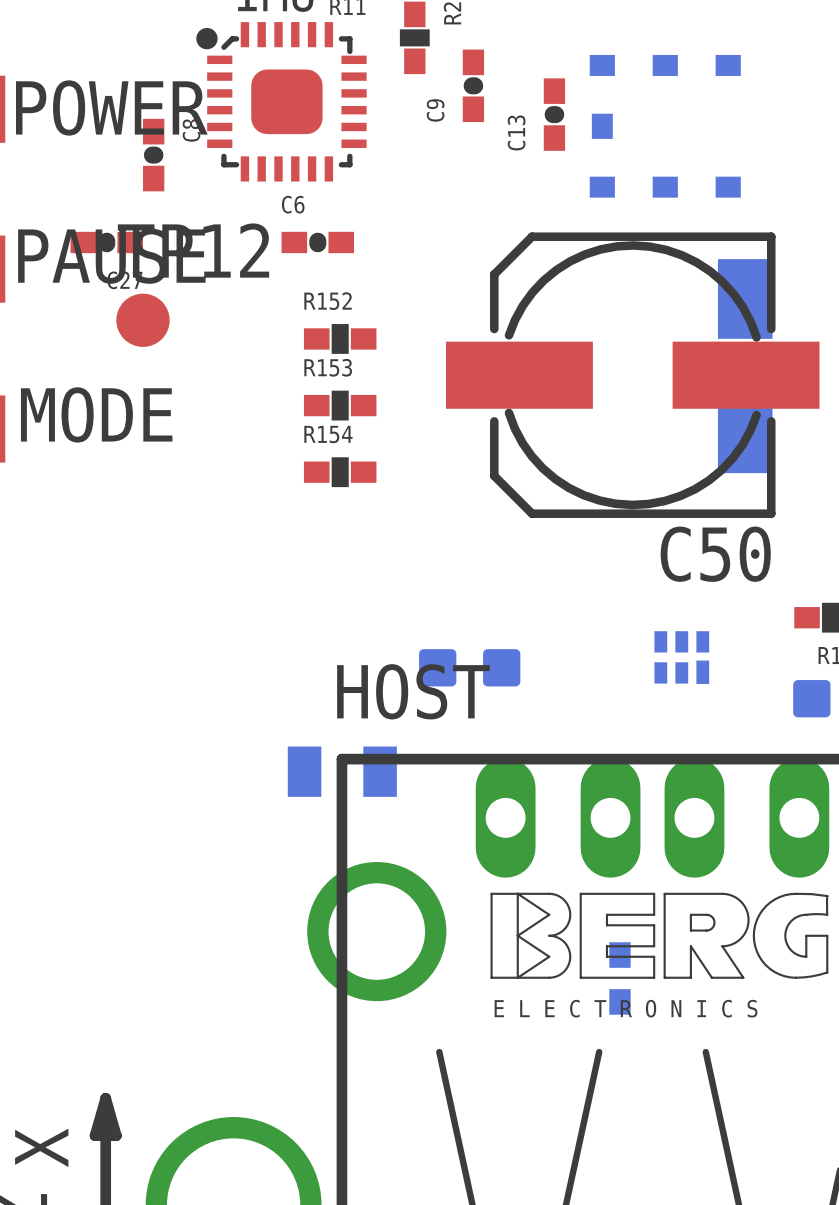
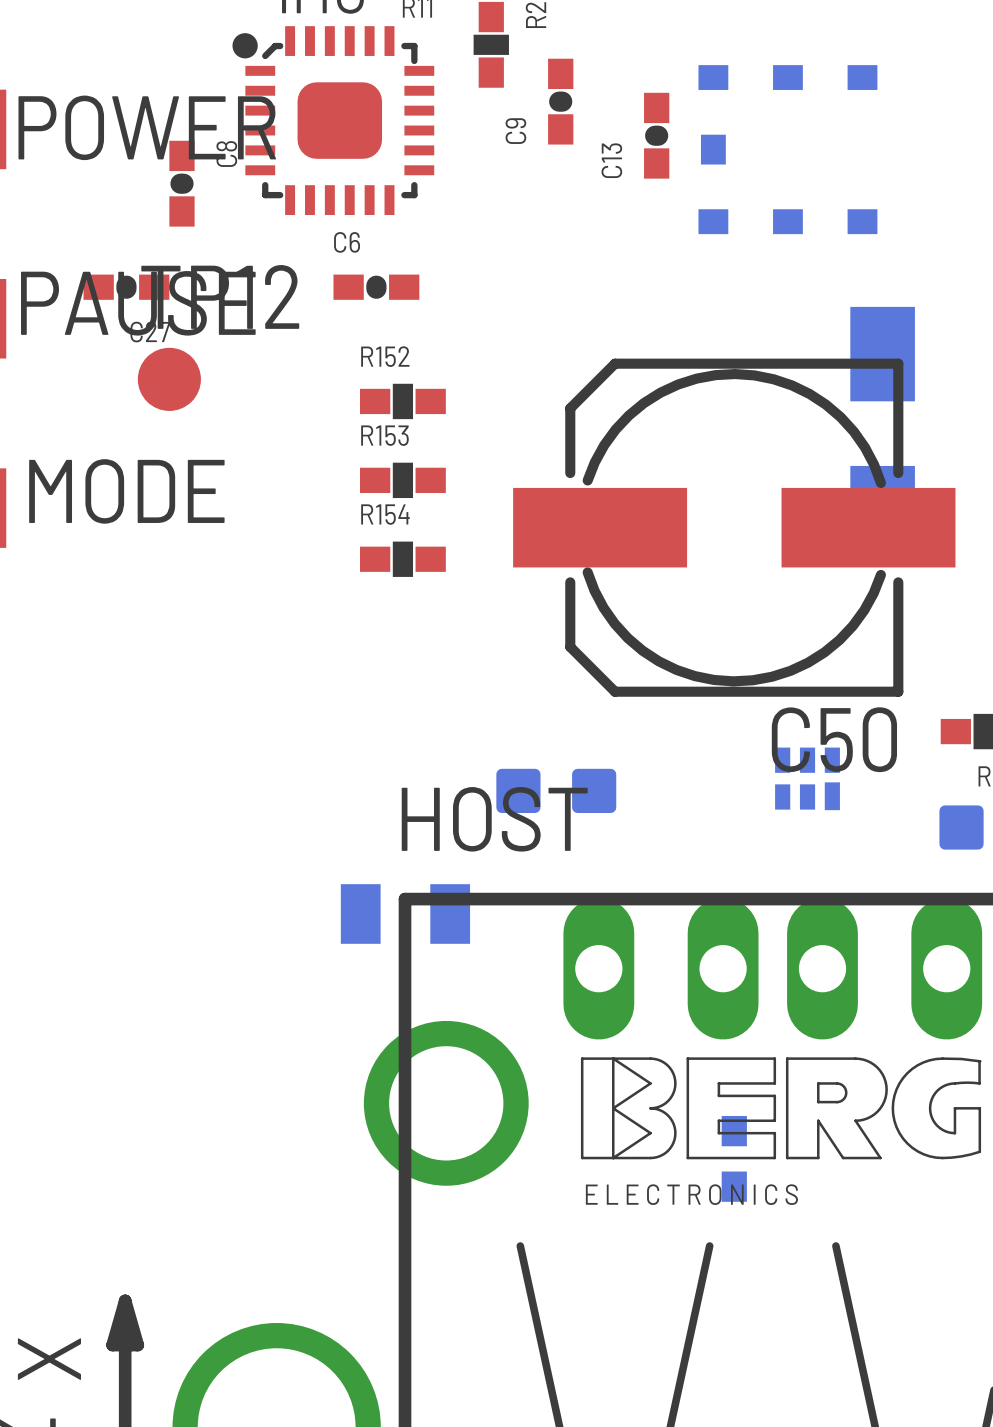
C50 position: (632, 375) -> (734, 527)

